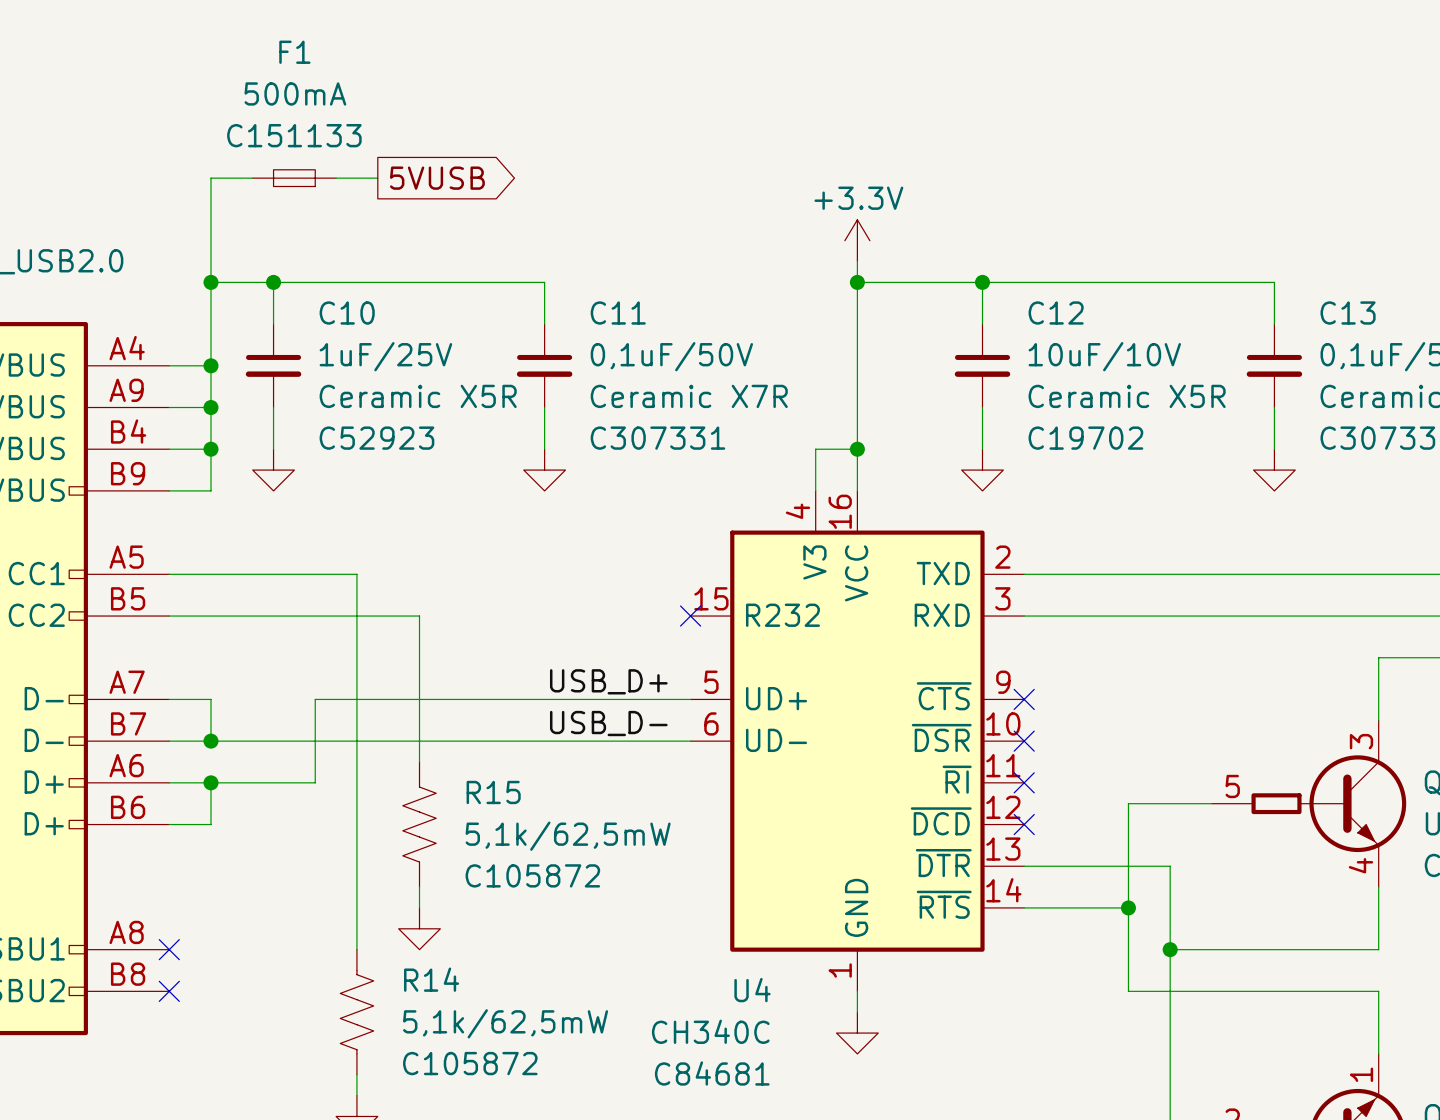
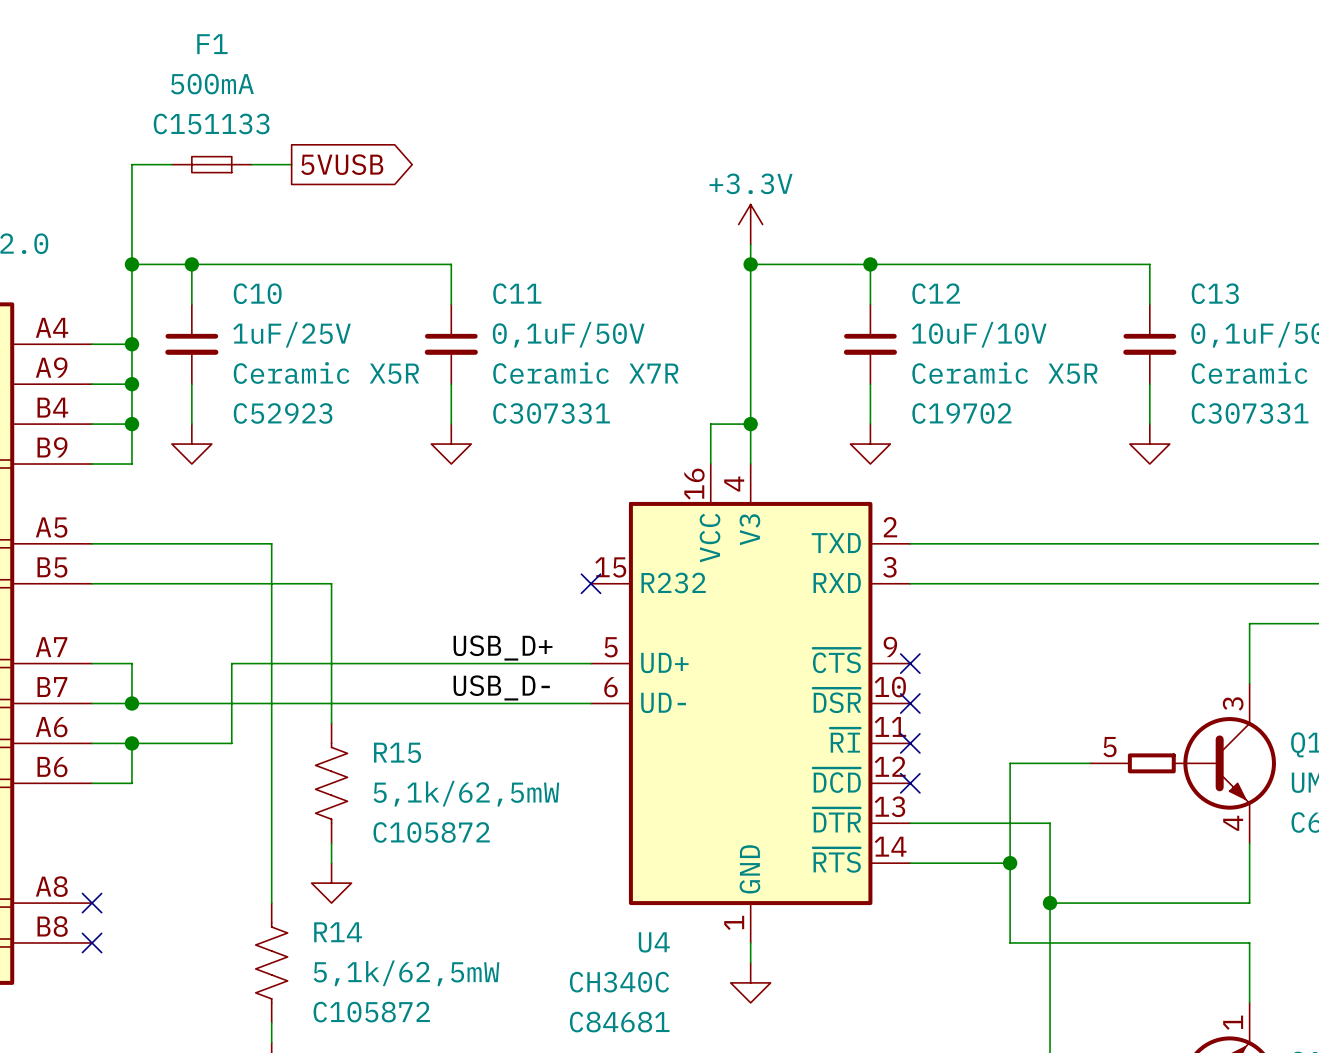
U4 pin number: 4 (797, 511) -> 16 (694, 484)
U4 pin number: 16 (840, 511) -> 4 (734, 484)
U4 pin name: V3 (814, 562) -> VCC (710, 538)
U4 pin name: VCC (856, 573) -> V3 (749, 529)

